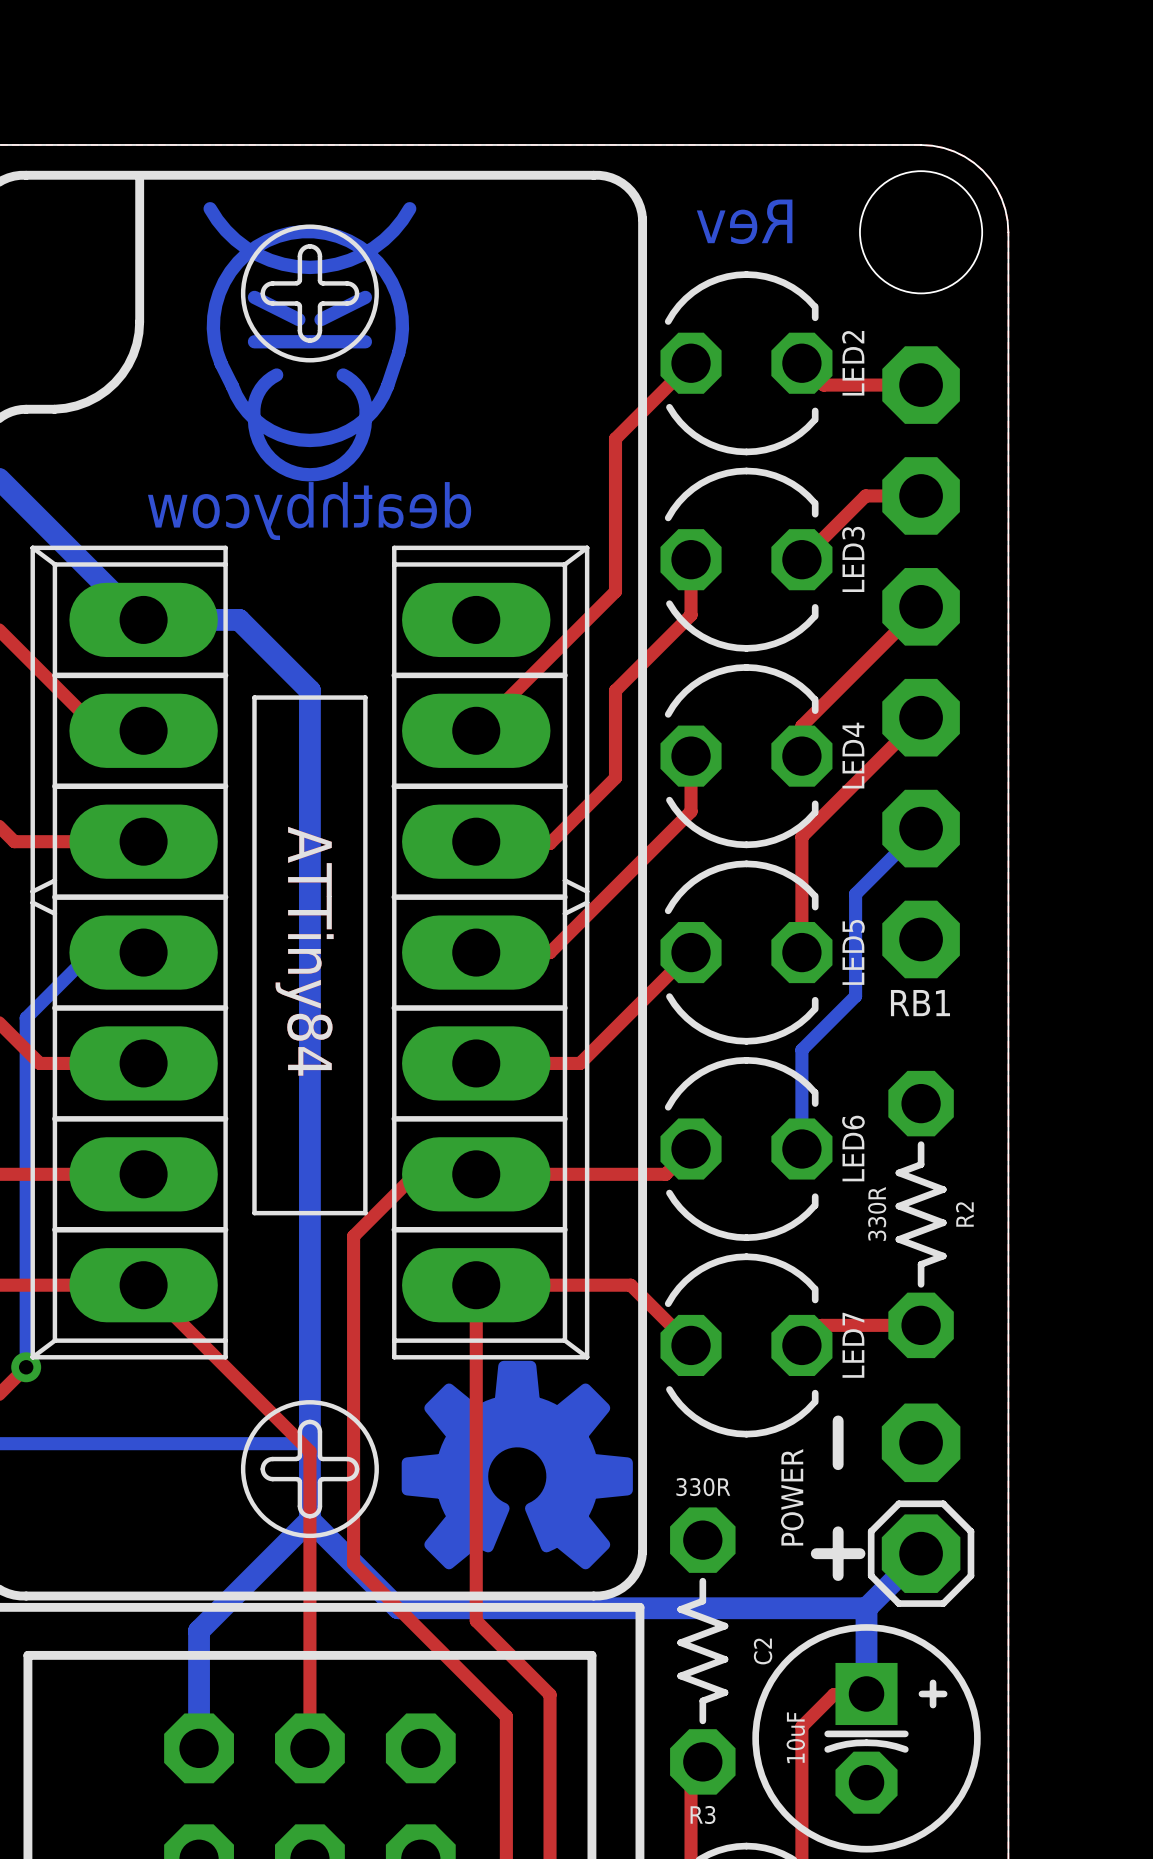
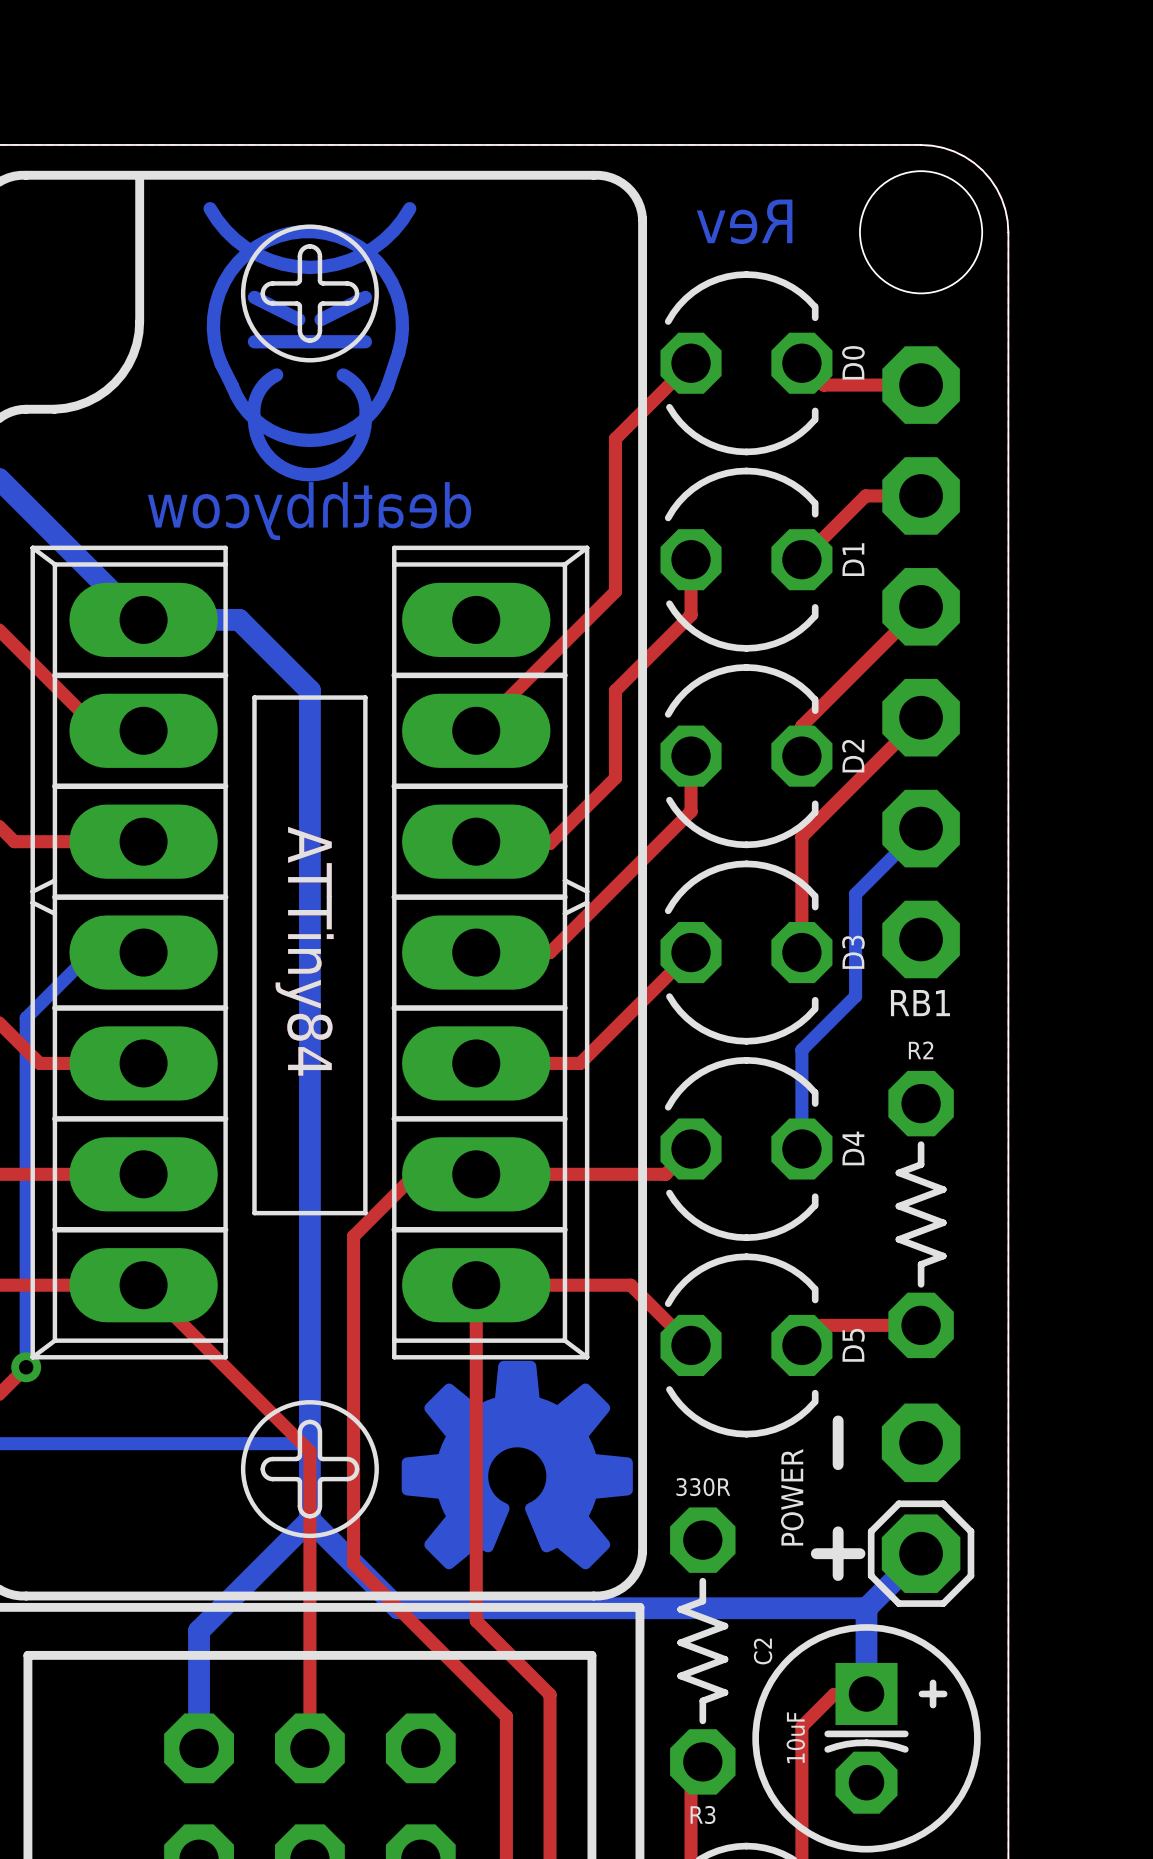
LED2 name: LED2 (853, 363) -> D0 (853, 362)
LED3 name: LED3 (853, 559) -> D1 (853, 559)
LED4 name: LED4 (853, 755) -> D2 (853, 756)
LED5 name: LED5 (853, 952) -> D3 (853, 952)
LED6 name: LED6 (853, 1148) -> D4 (853, 1148)
R2 value: 330R (877, 1213) -> none
R2 name rotation: 0° (964, 1214) -> 90° clockwise (921, 1050)
R2 name position: R2 (964, 1214) -> R2 (921, 1050)
LED7 name: LED7 (853, 1345) -> D5 (853, 1345)

